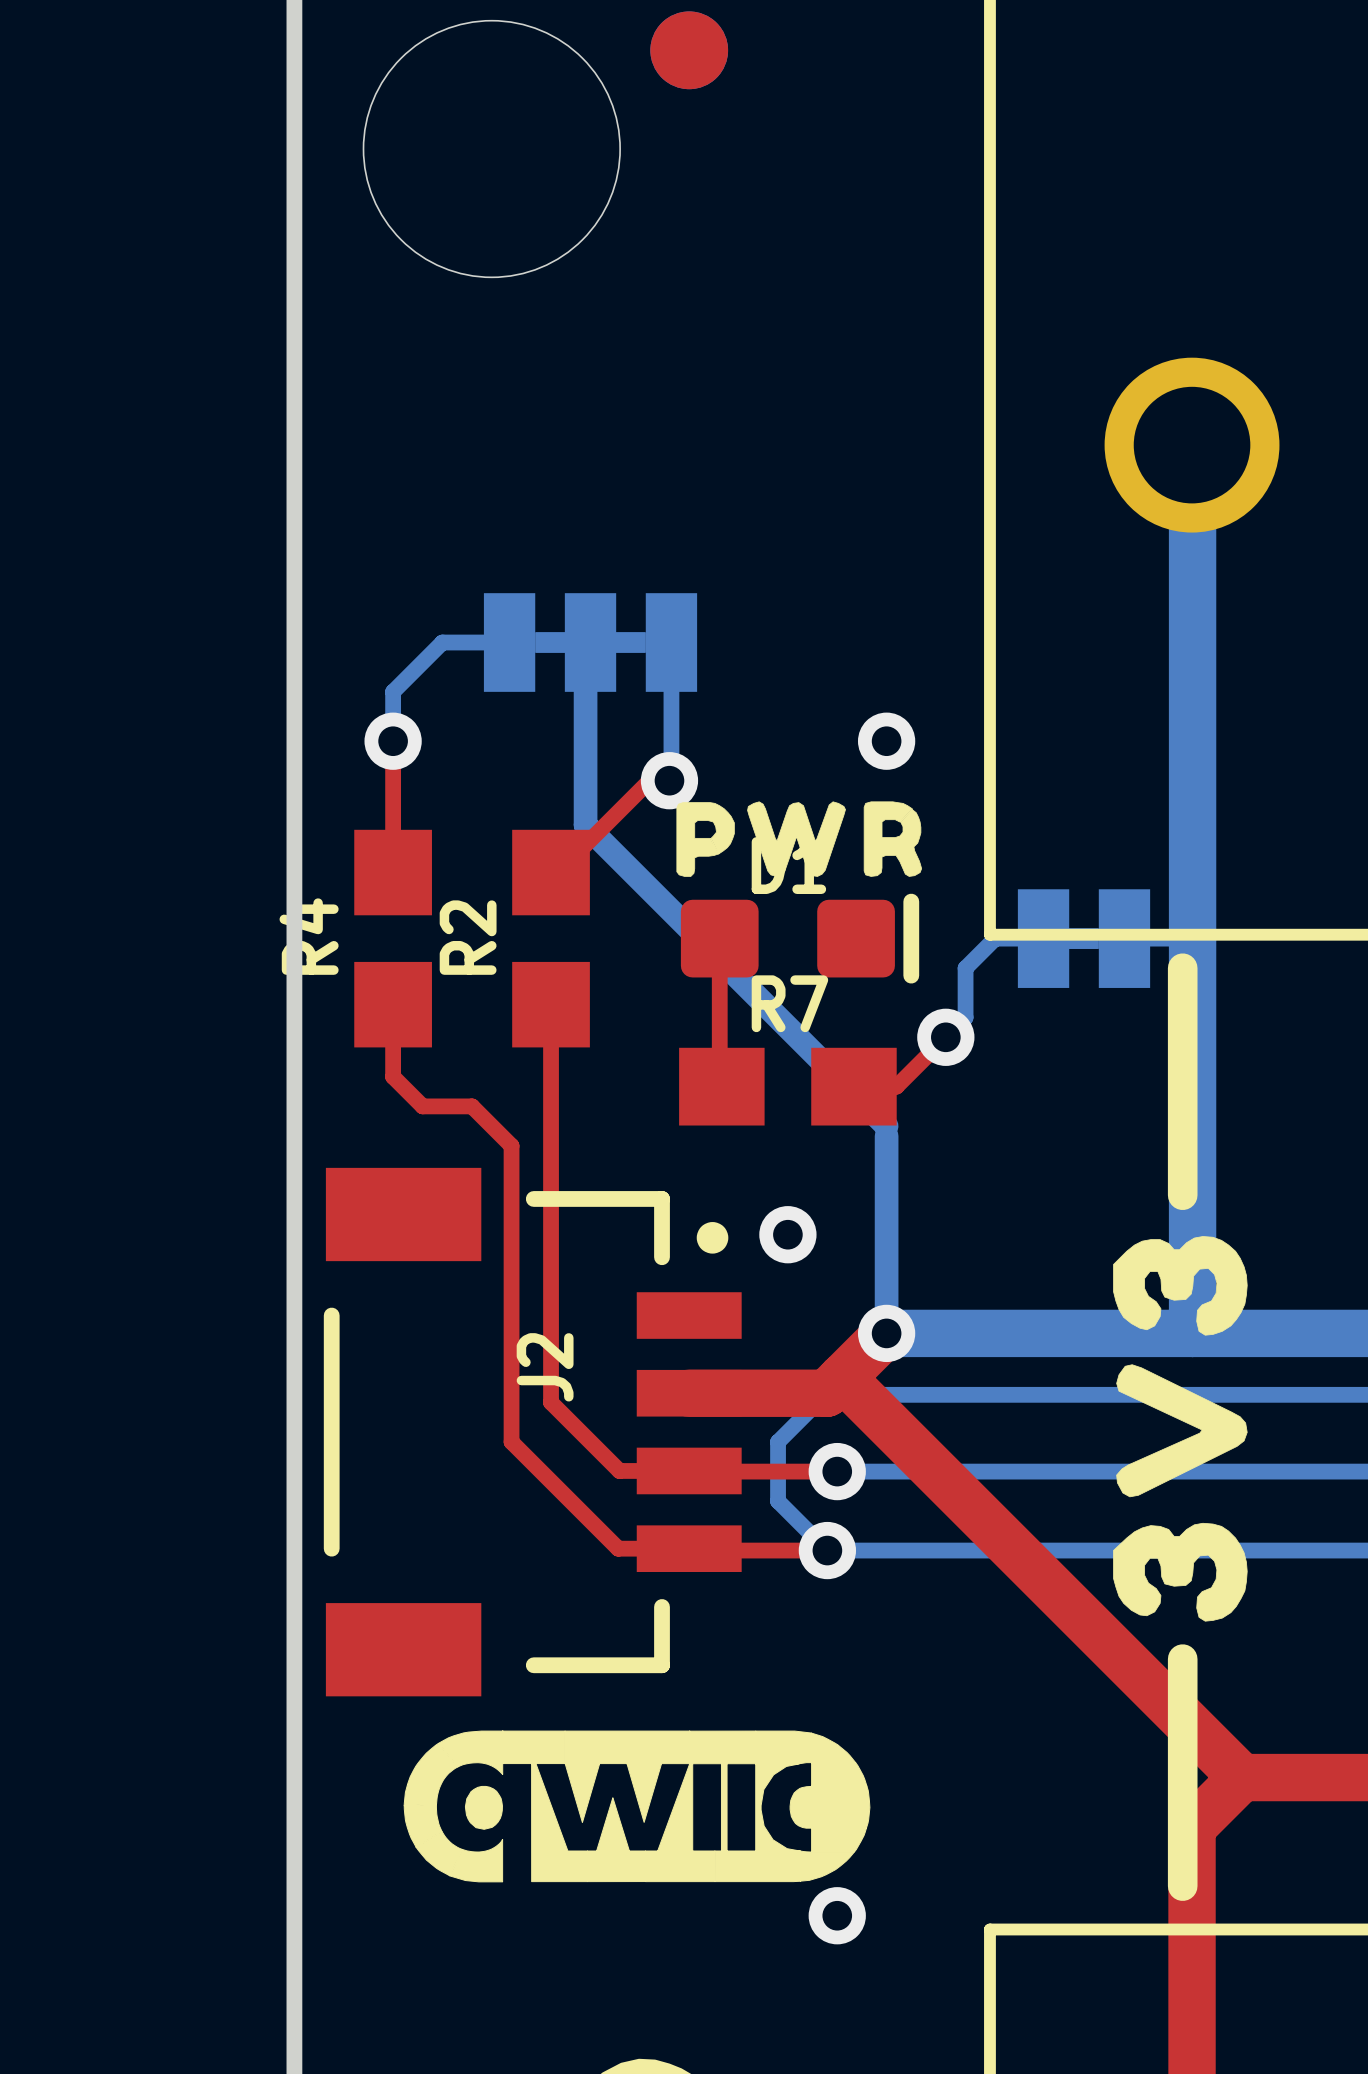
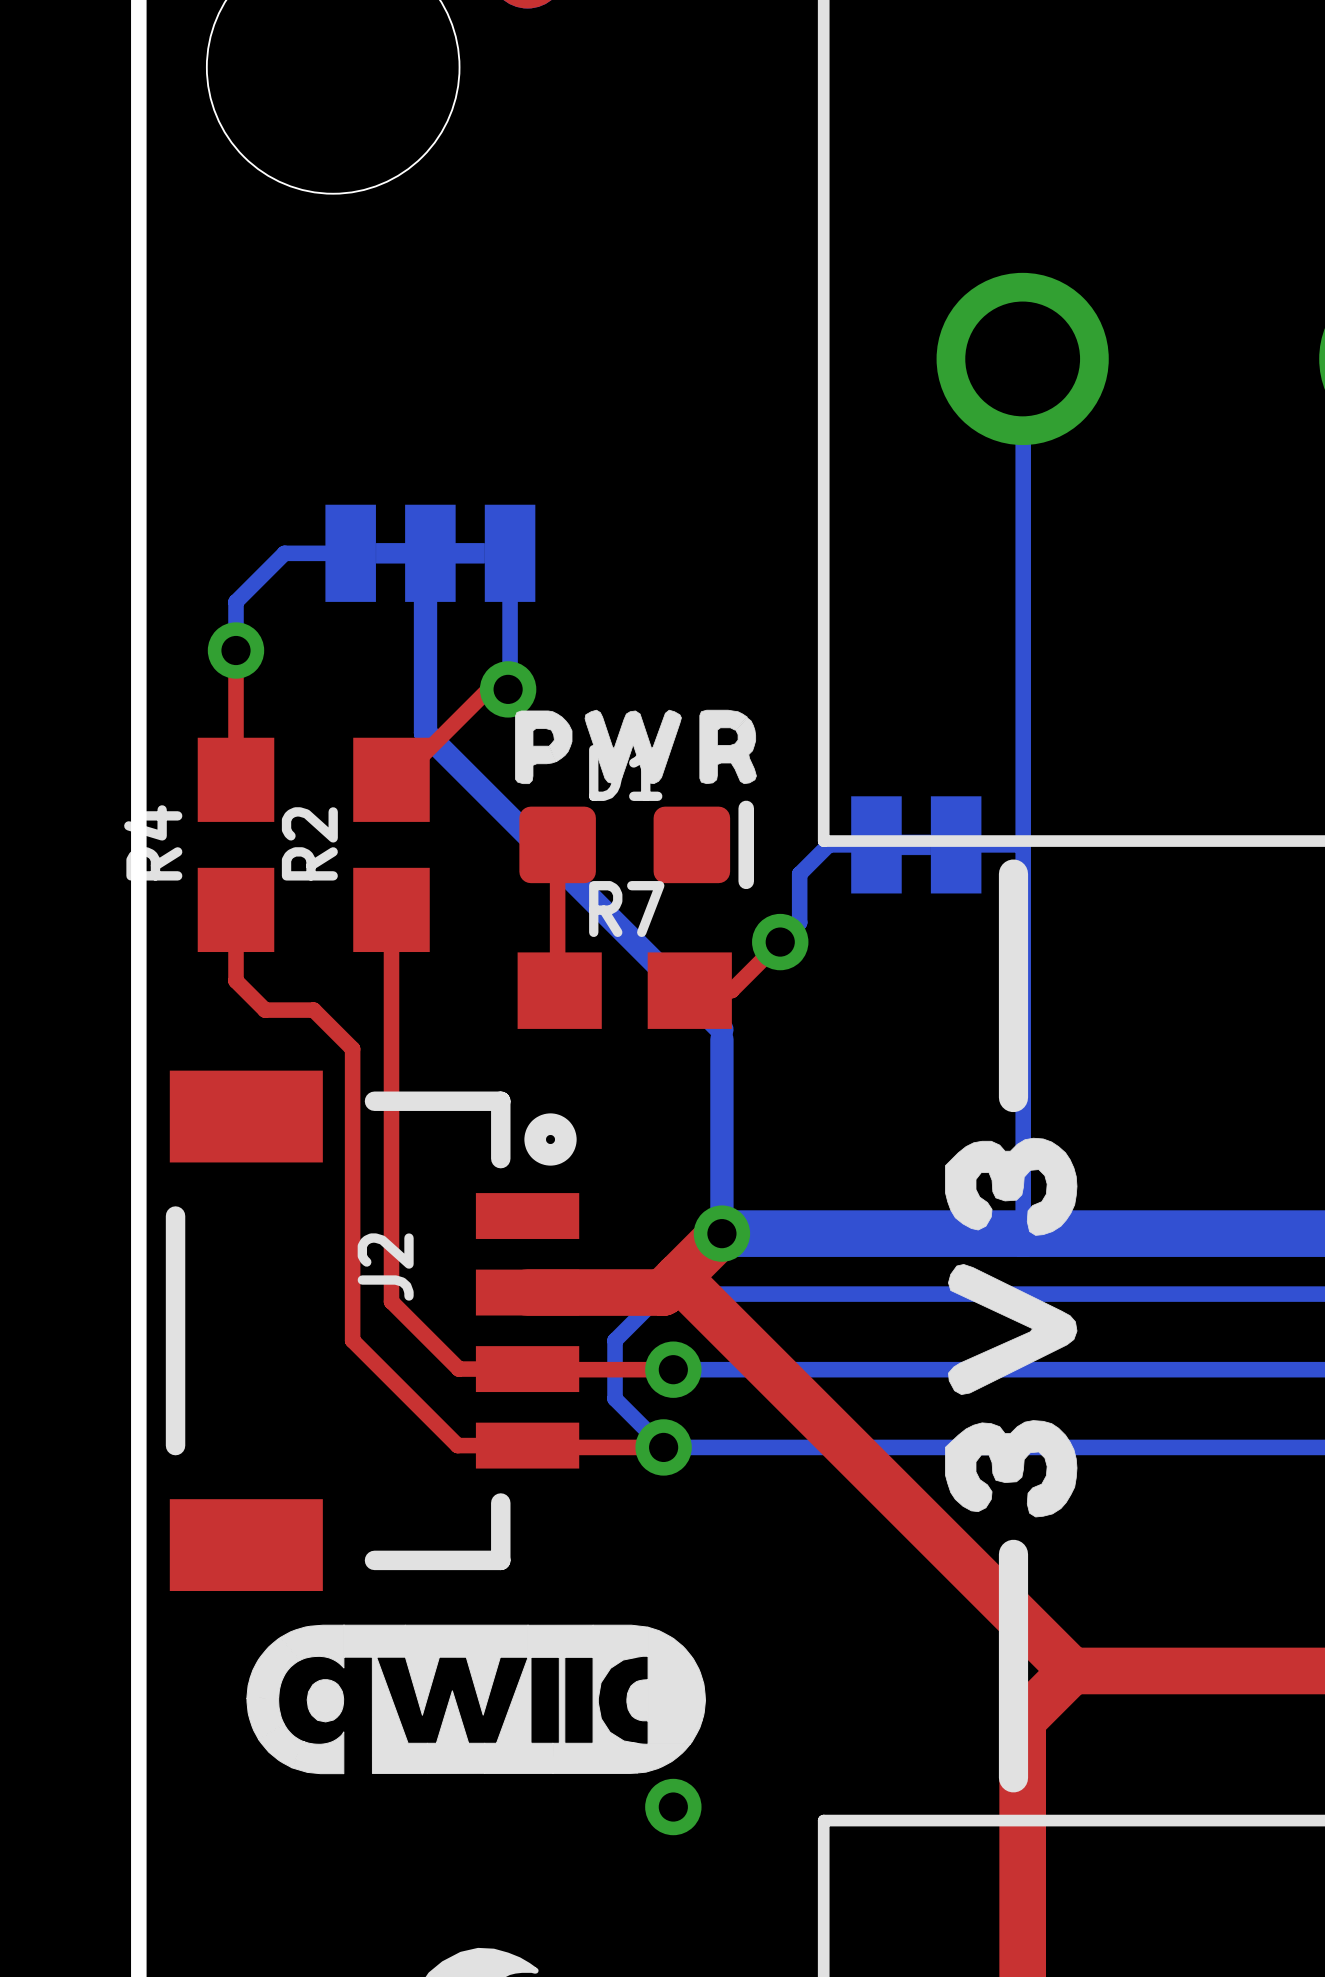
bottom track width: thick (1192, 445) (1192, 1333) -> thin (1023, 359) (1023, 1233)
via: (886, 741) -> none
J2 footprint: [323, 1167, 742, 1697] -> [165, 1070, 580, 1591]
via: (787, 1234) -> none

